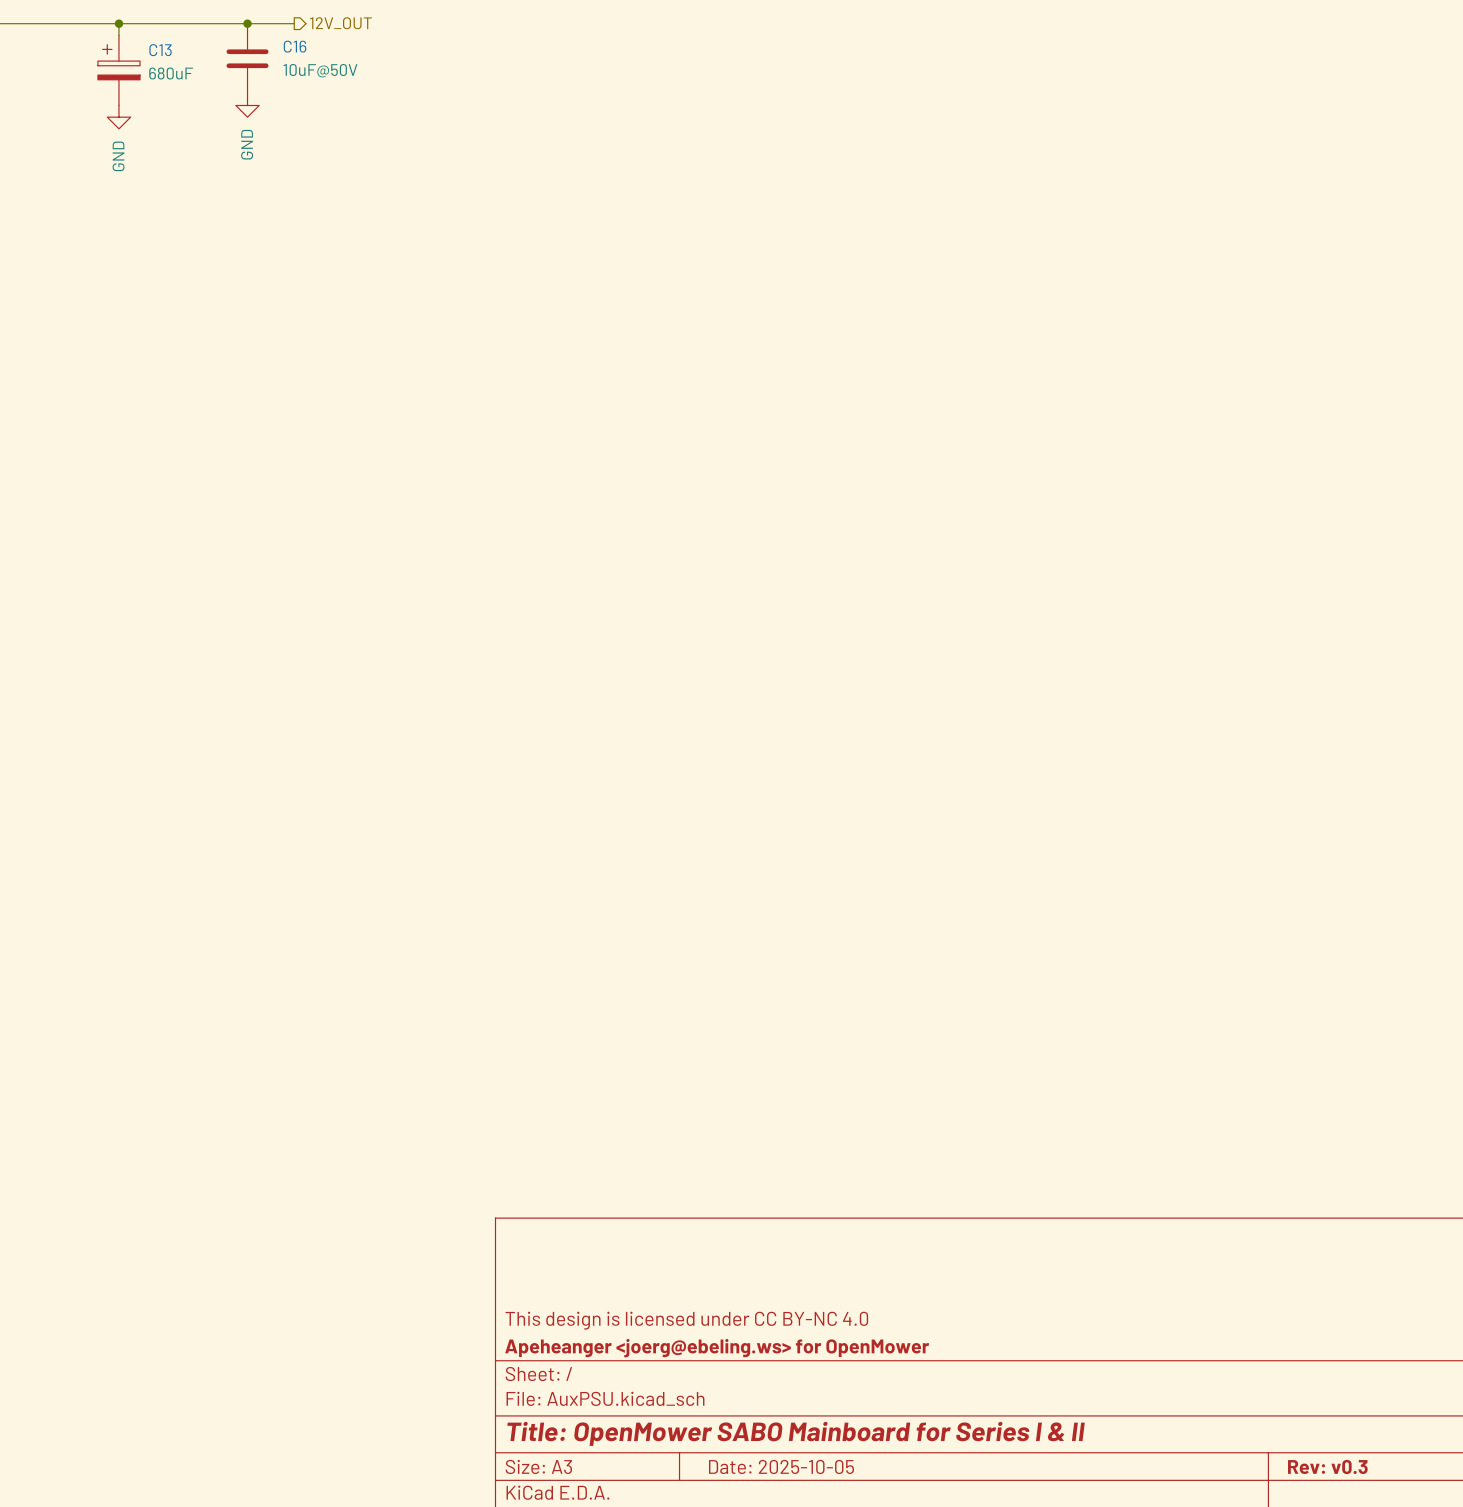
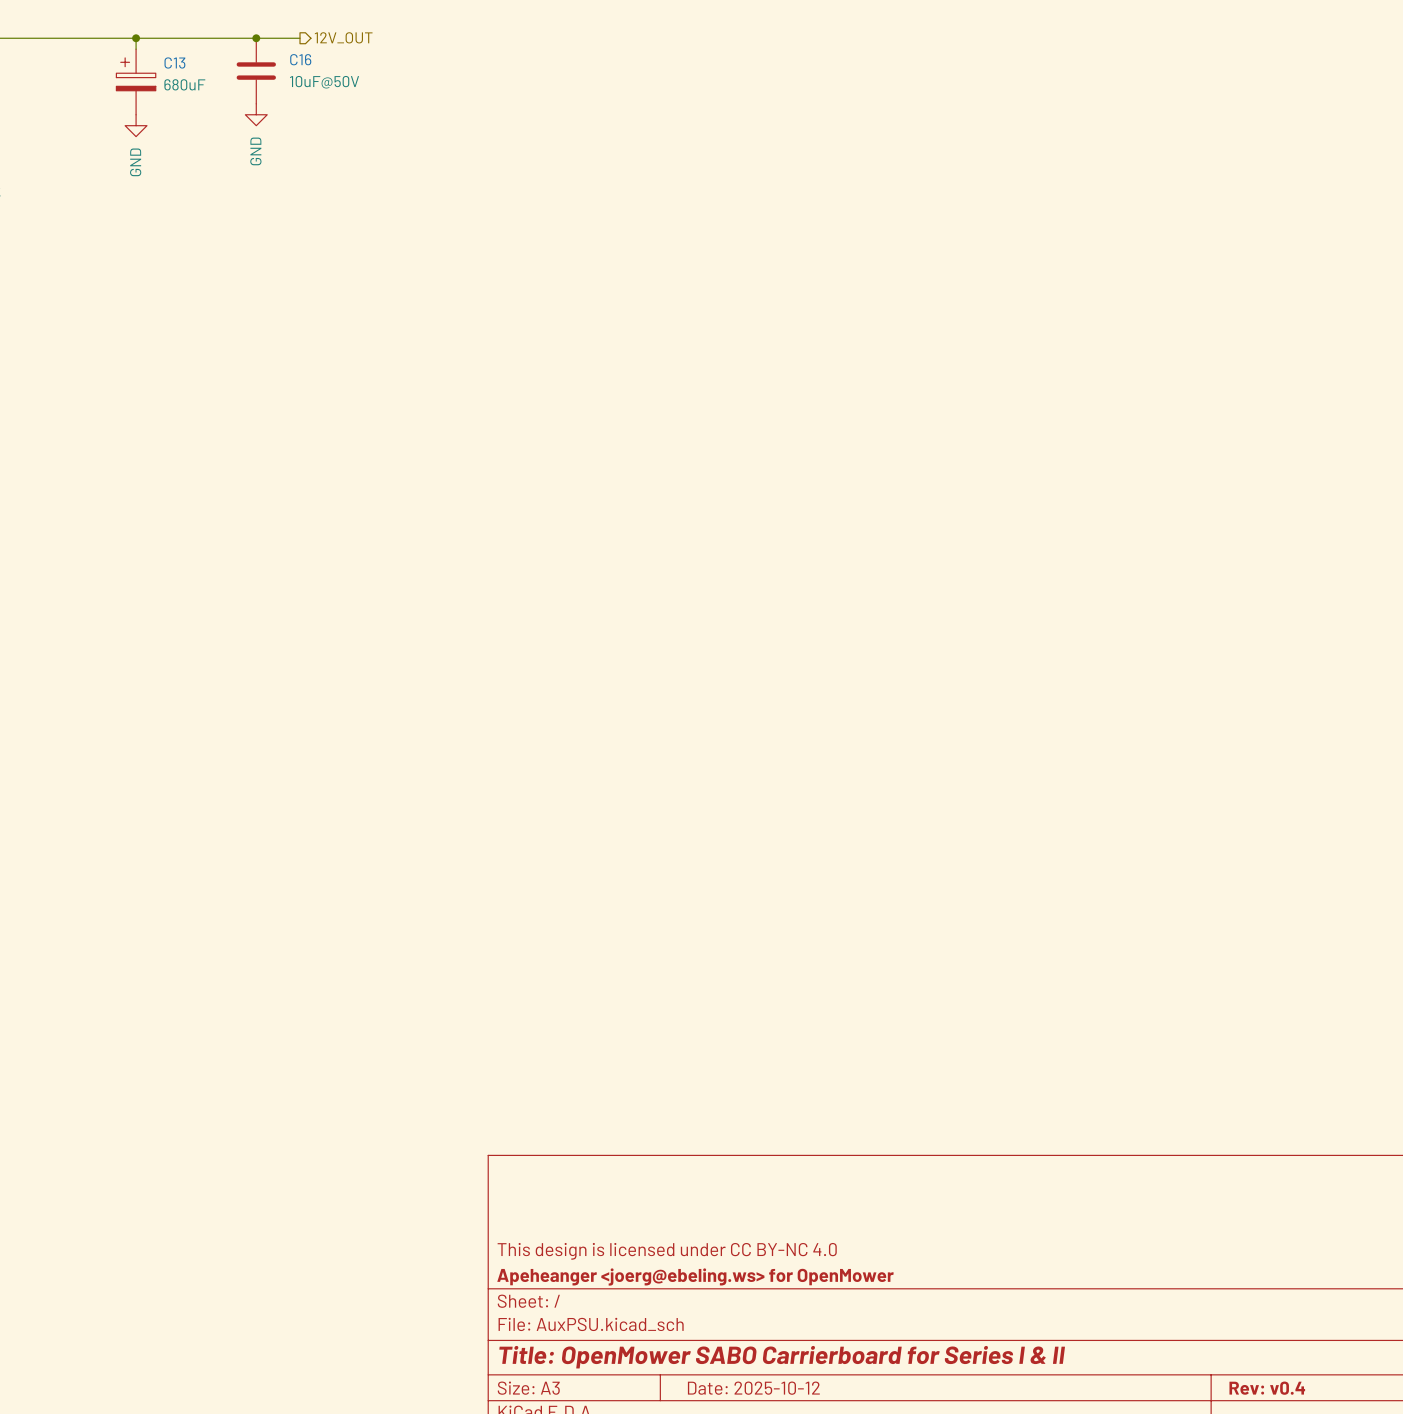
title block: Title: OpenMower SABO Mainboard for Series I & II (796, 1433) -> Title: OpenMower SABO Carrierboard for Series I & II (782, 1357)
title block: Date: 2025-10-05 (781, 1466) -> Date: 2025-10-12 (753, 1388)
title block: Rev: v0.3 (1327, 1466) -> Rev: v0.4 (1267, 1388)

